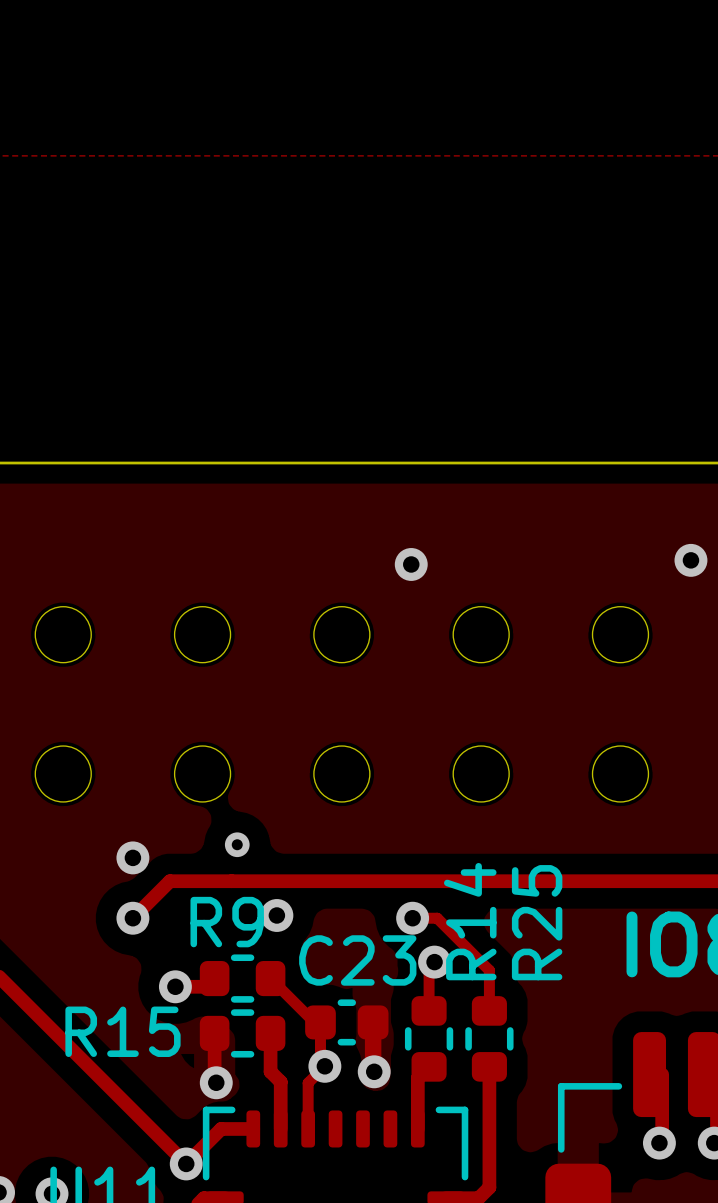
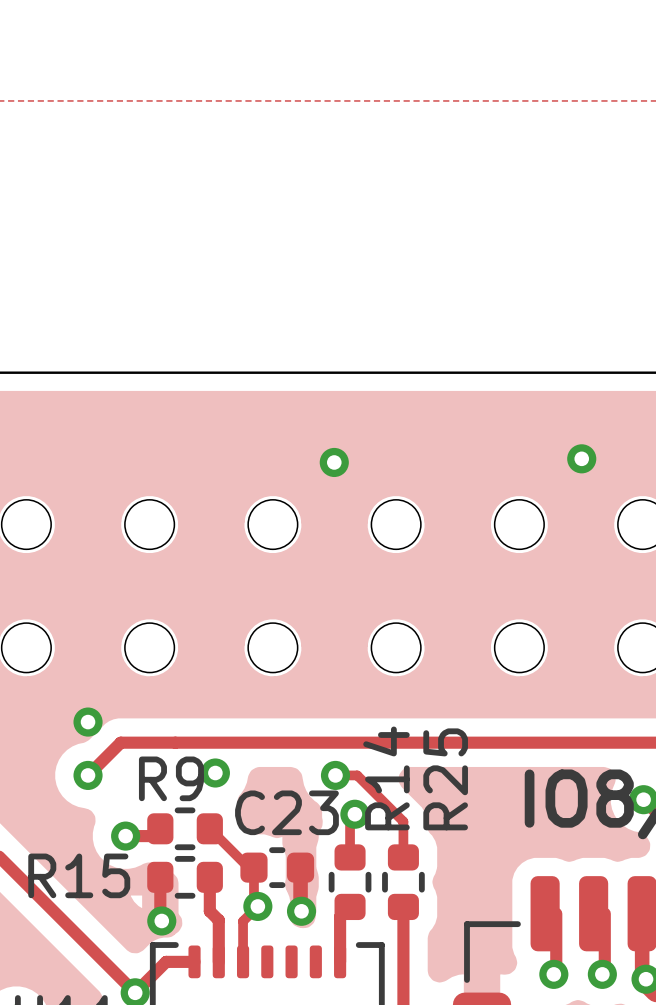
via: (237, 844) -> none

